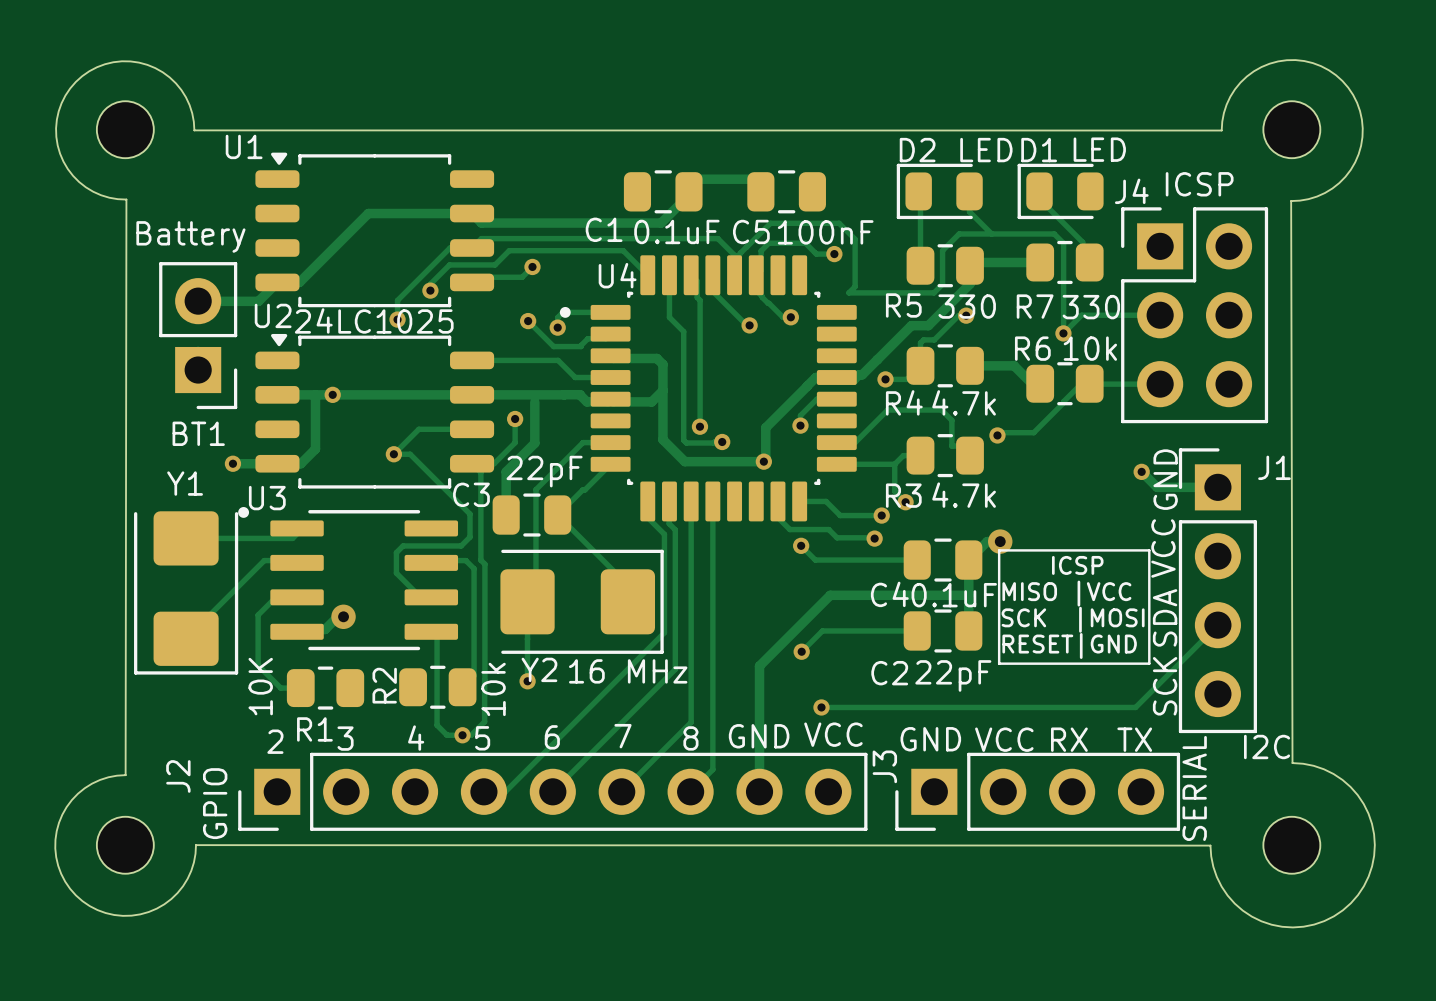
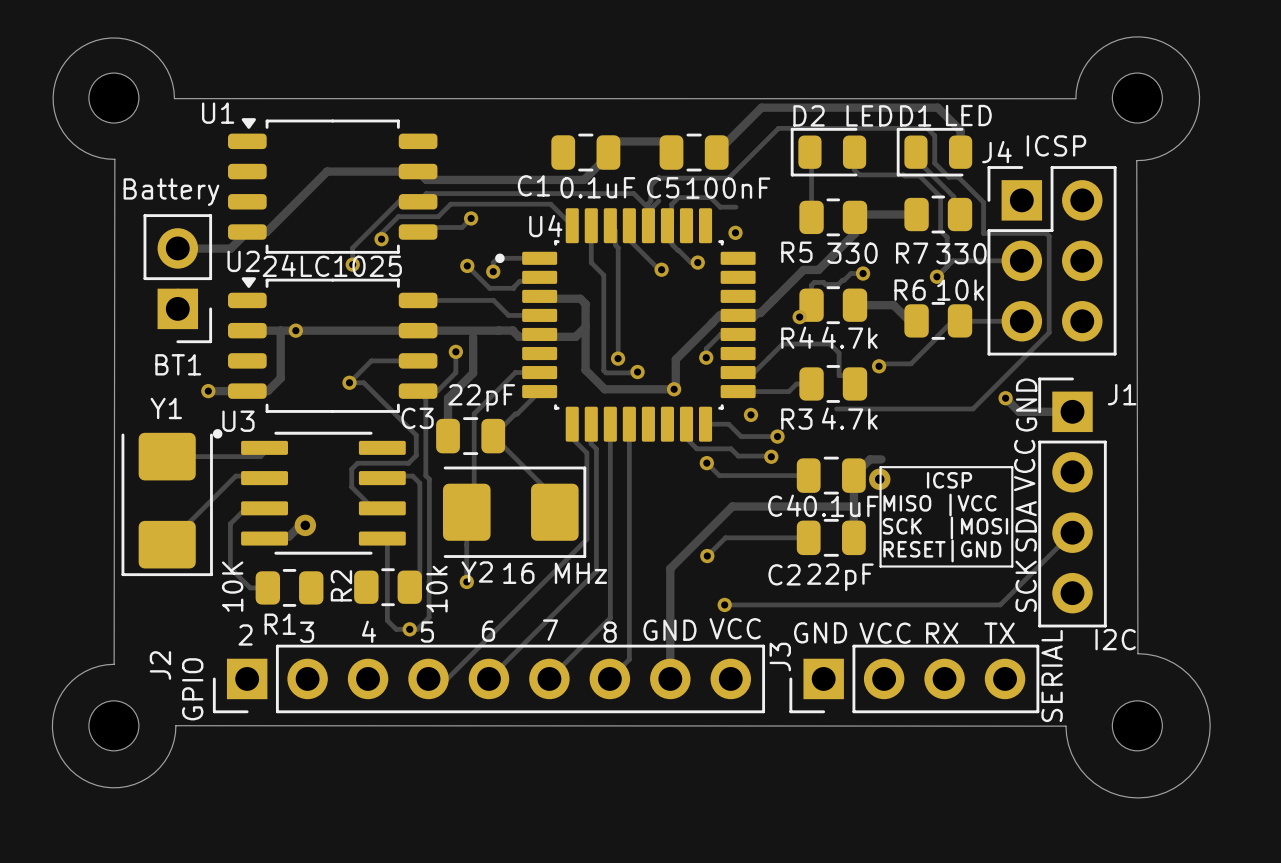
track: none -> (960, 152) (960, 130) (937, 107) (761, 107) (716, 152)
track: (975, 217) (991, 233) -> (859, 174) (919, 175) (940, 197) (940, 230) (947, 237) (947, 266)
track: (746, 247) (770, 223) (839, 223) (855, 239) (855, 286) (848, 292) (934, 292) (942, 284) (942, 250) (959, 233) (1054, 233) (1063, 243) (1063, 333) -> none
via position: (834, 254) -> (735, 232)
track: none -> (648, 208) (648, 203) (650, 201) (650, 185) (658, 177) (728, 178) (778, 128) (927, 128) (934, 135) (934, 163) (948, 177) (958, 177) (983, 202) (983, 233) (1046, 233) (1049, 236) (1049, 332) (972, 408) (836, 408)
track: (966, 315) (958, 315) (934, 339) -> (863, 273) (850, 273) (838, 284) (825, 284) (823, 282)
via position: (966, 315) -> (863, 273)
track: (885, 379) (906, 379) -> none
via position: (885, 379) -> (799, 317)
track: (894, 464) (894, 491) (905, 502) -> none
via position: (905, 502) -> (750, 414)
via position: (1000, 541) -> (879, 479)

